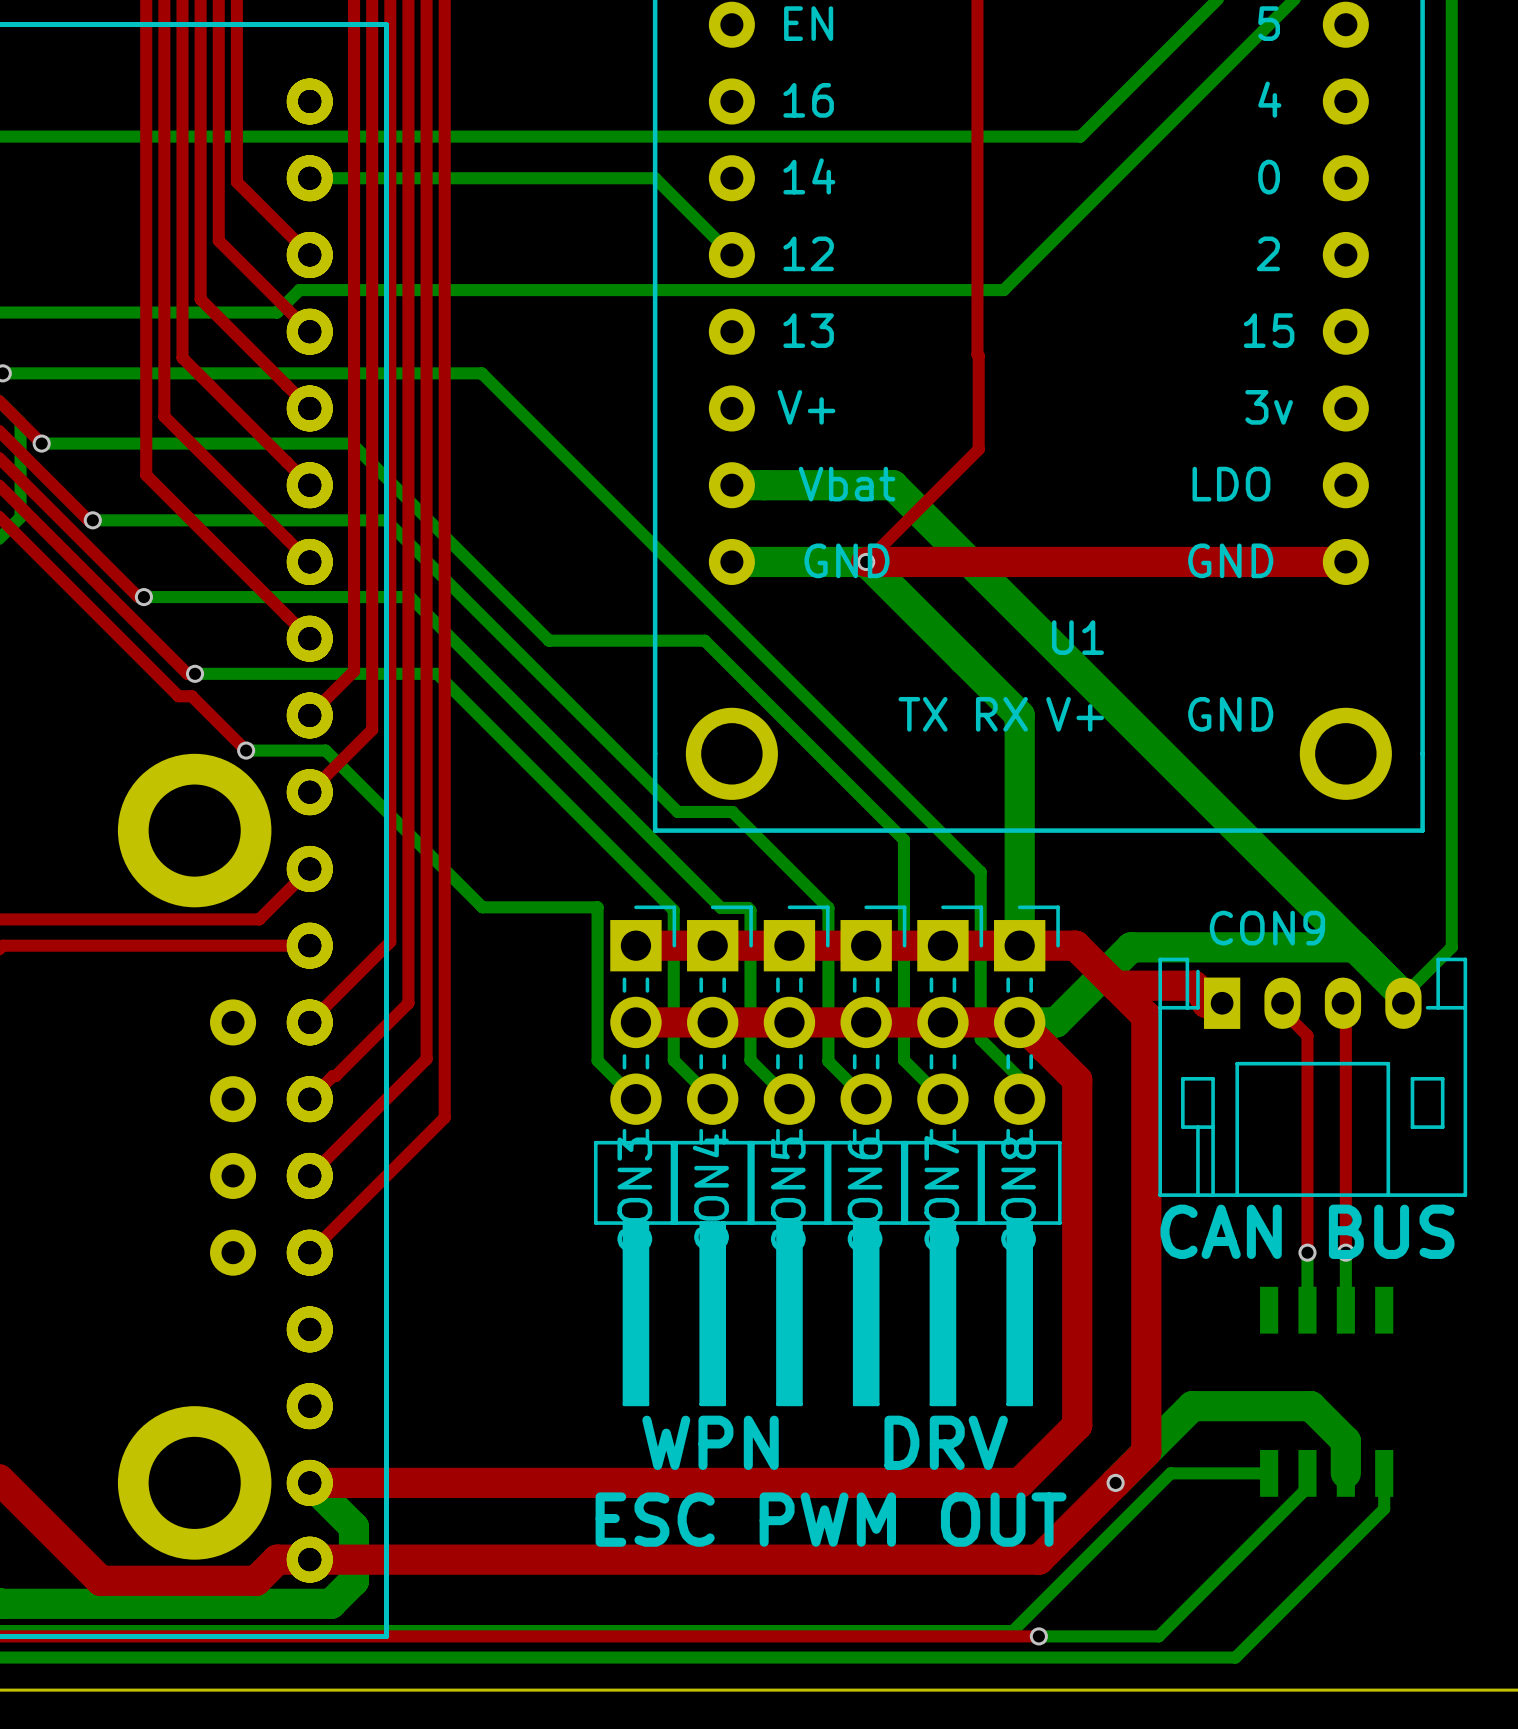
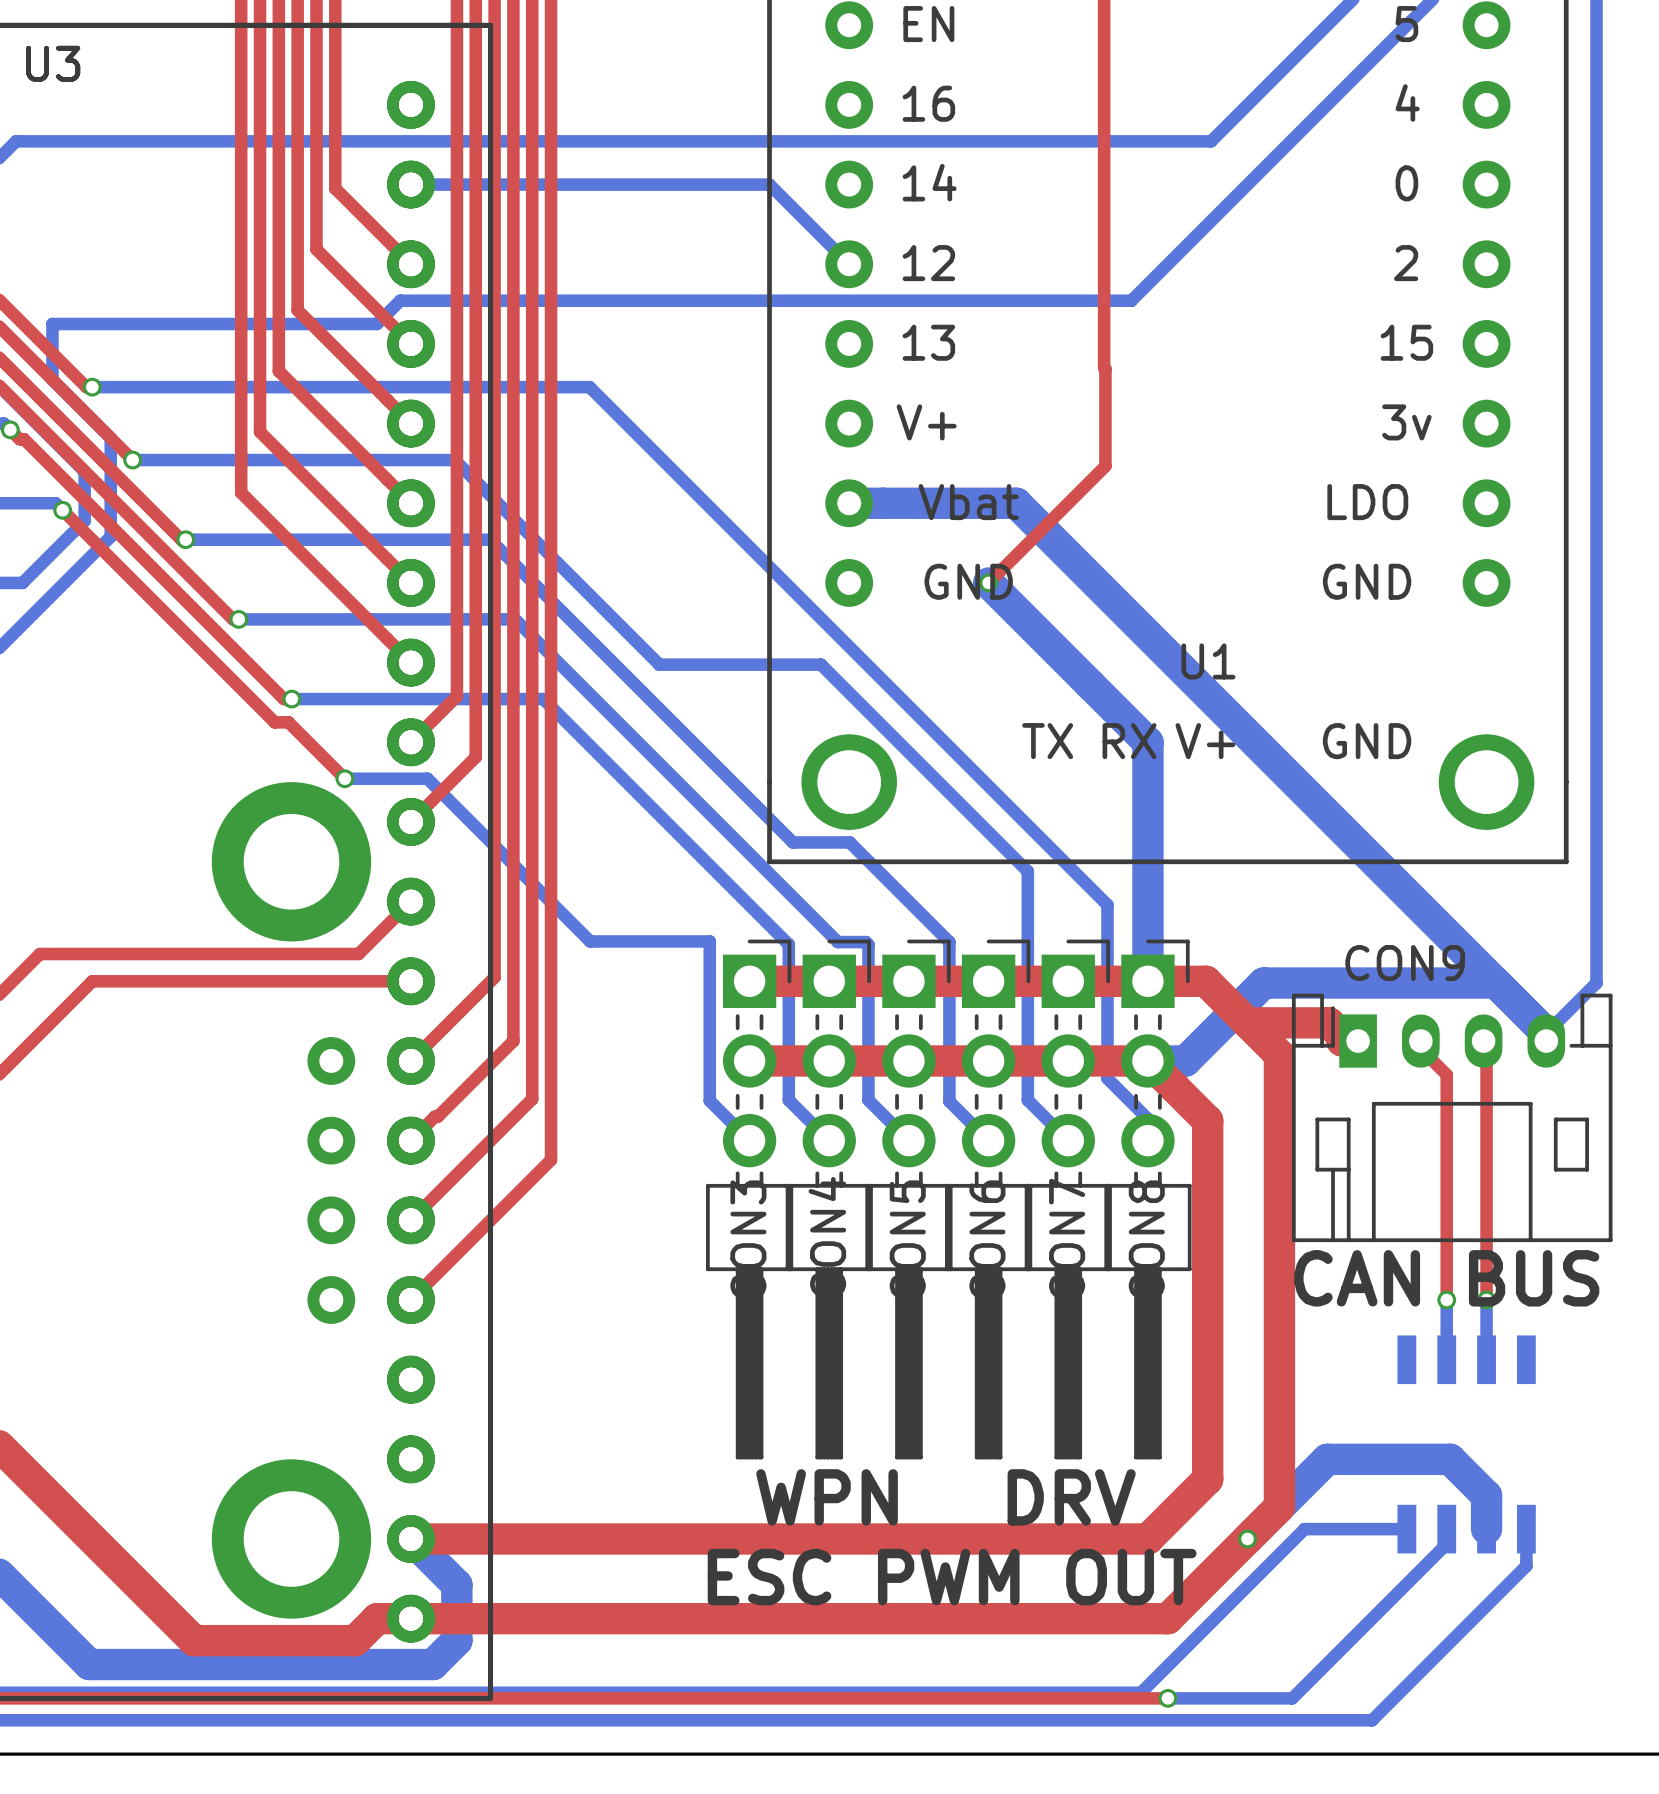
bottom track: (731, 561) (866, 561) -> none
top track: (866, 561) (1345, 561) -> none

